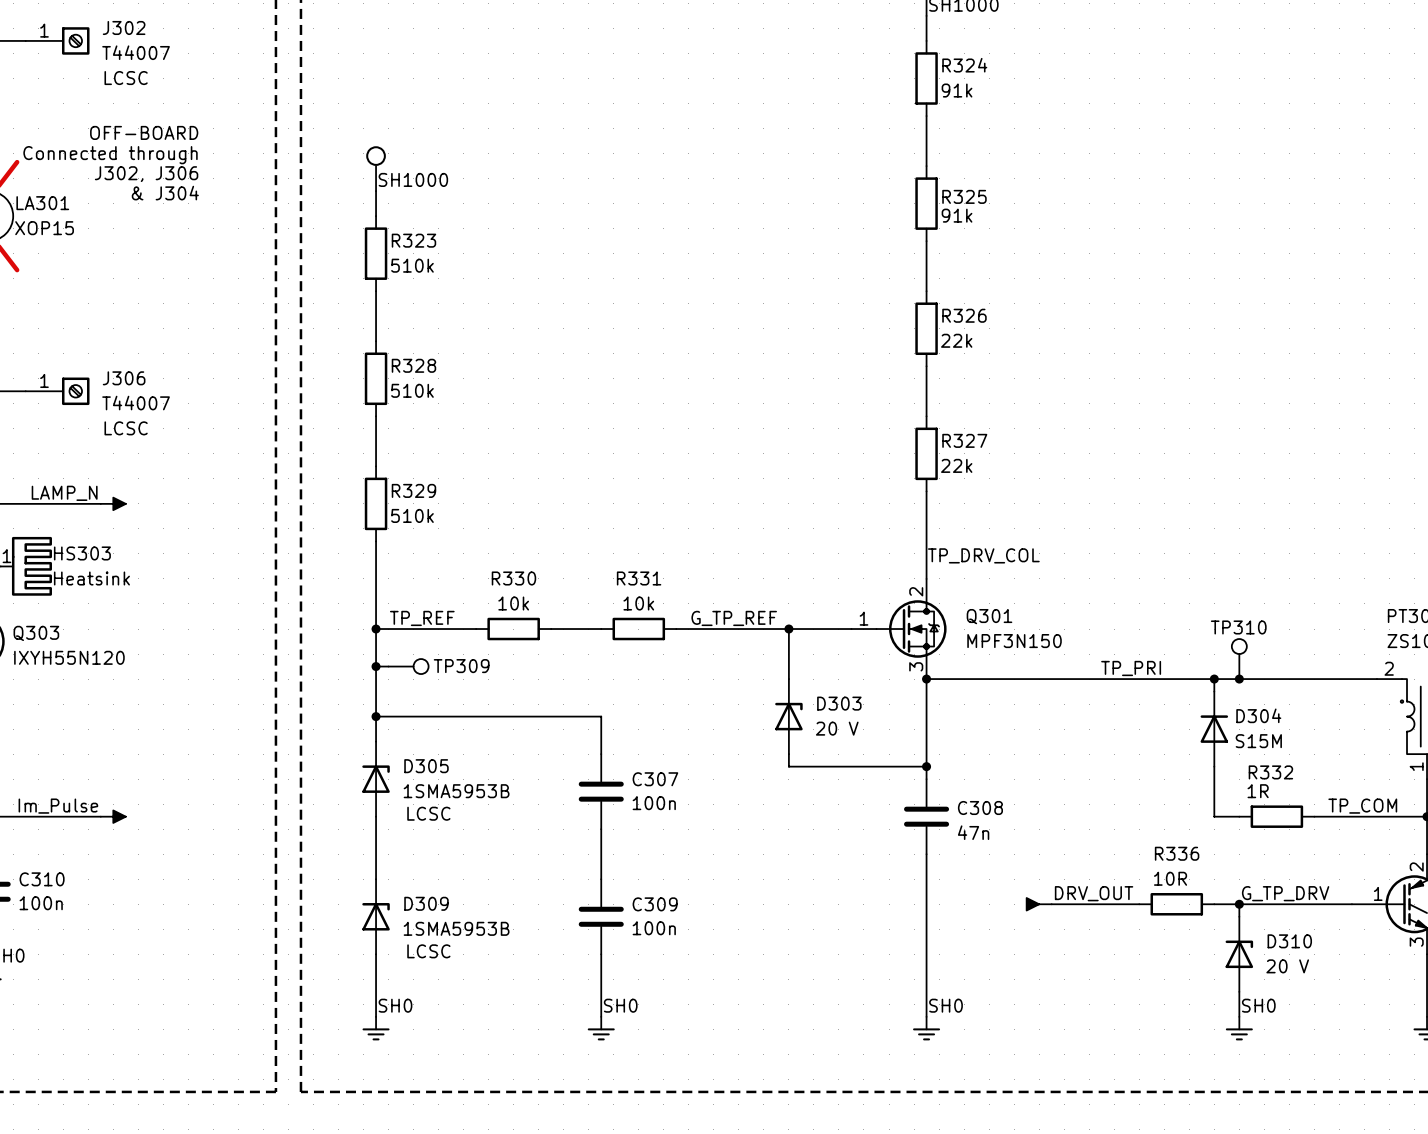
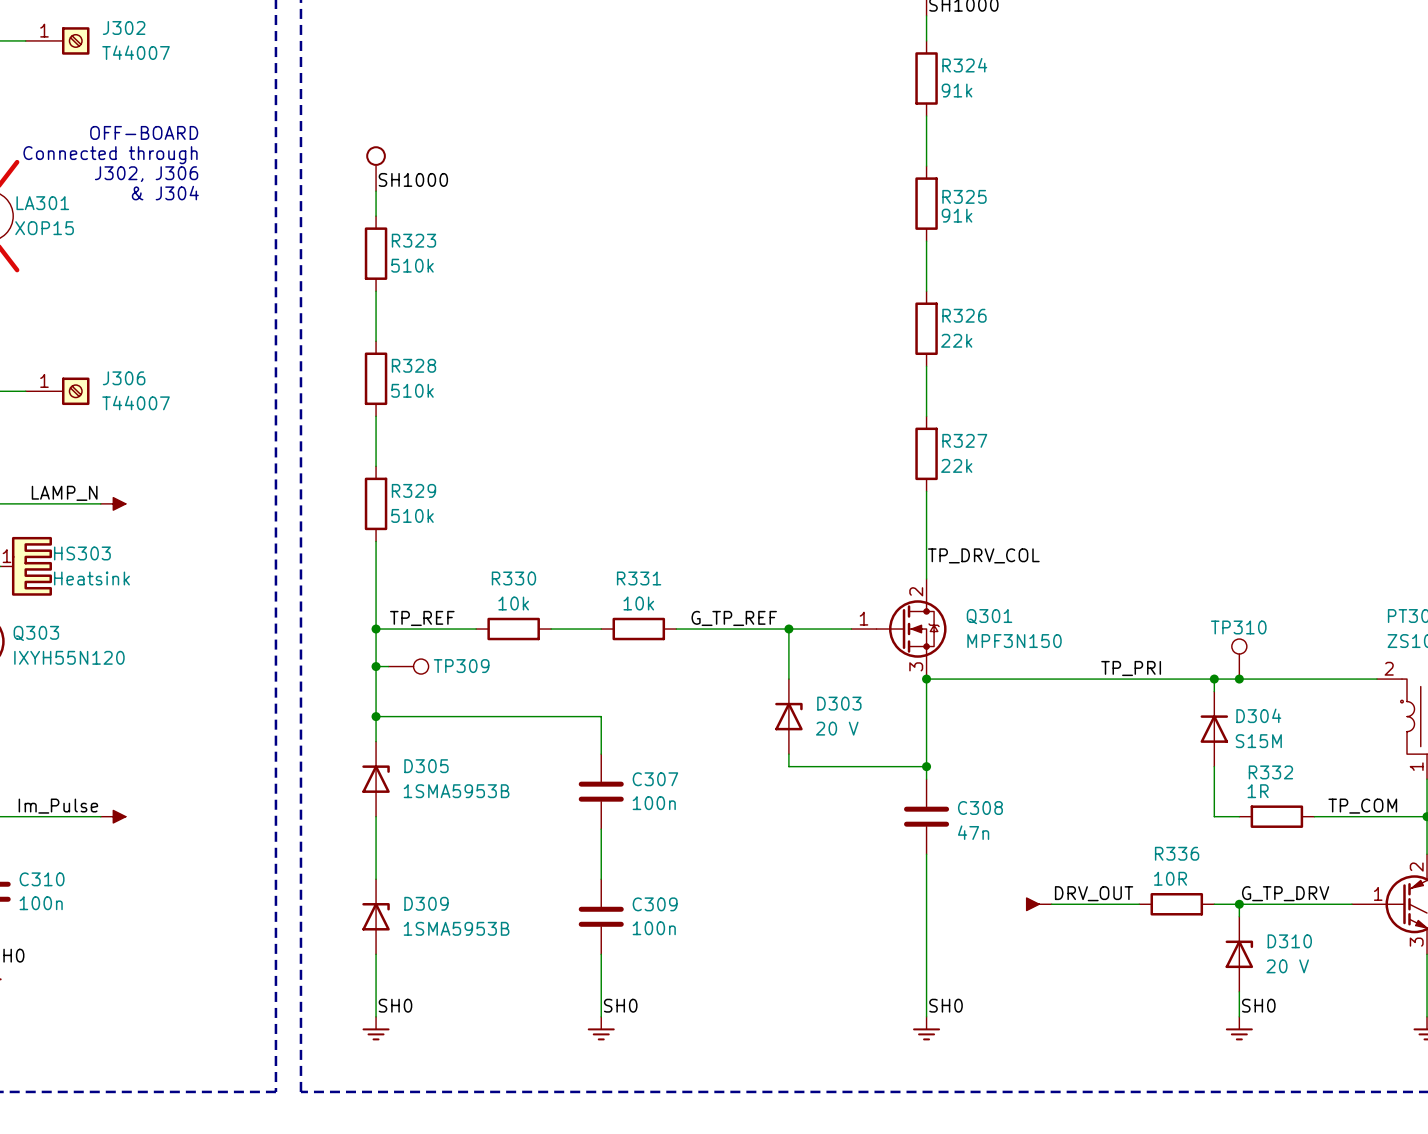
J302 text: LCSC (126, 78) -> none
J306 text: LCSC (126, 428) -> none
D305 text: LCSC (428, 813) -> none
D309 text: LCSC (428, 951) -> none

